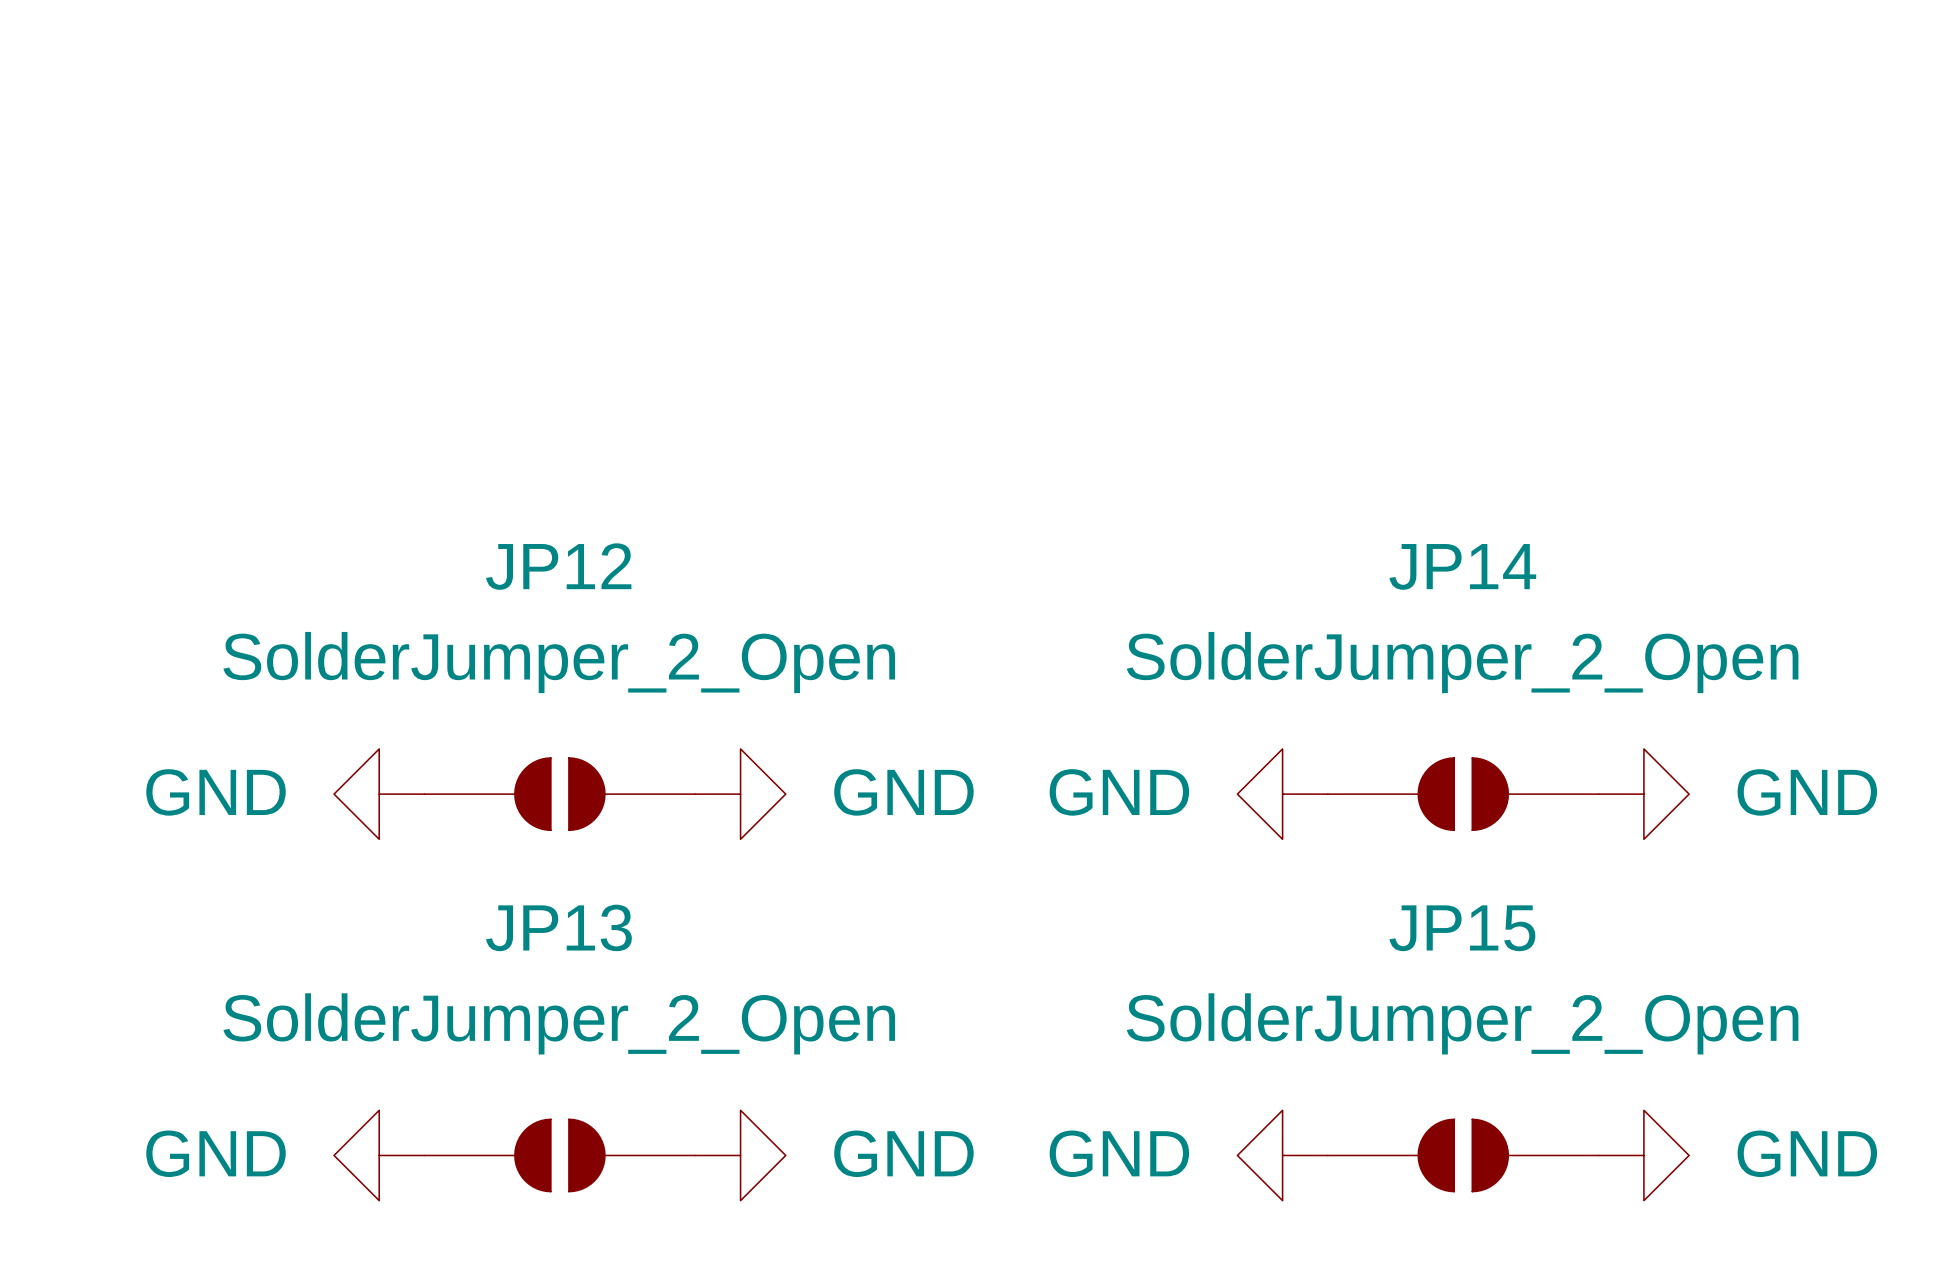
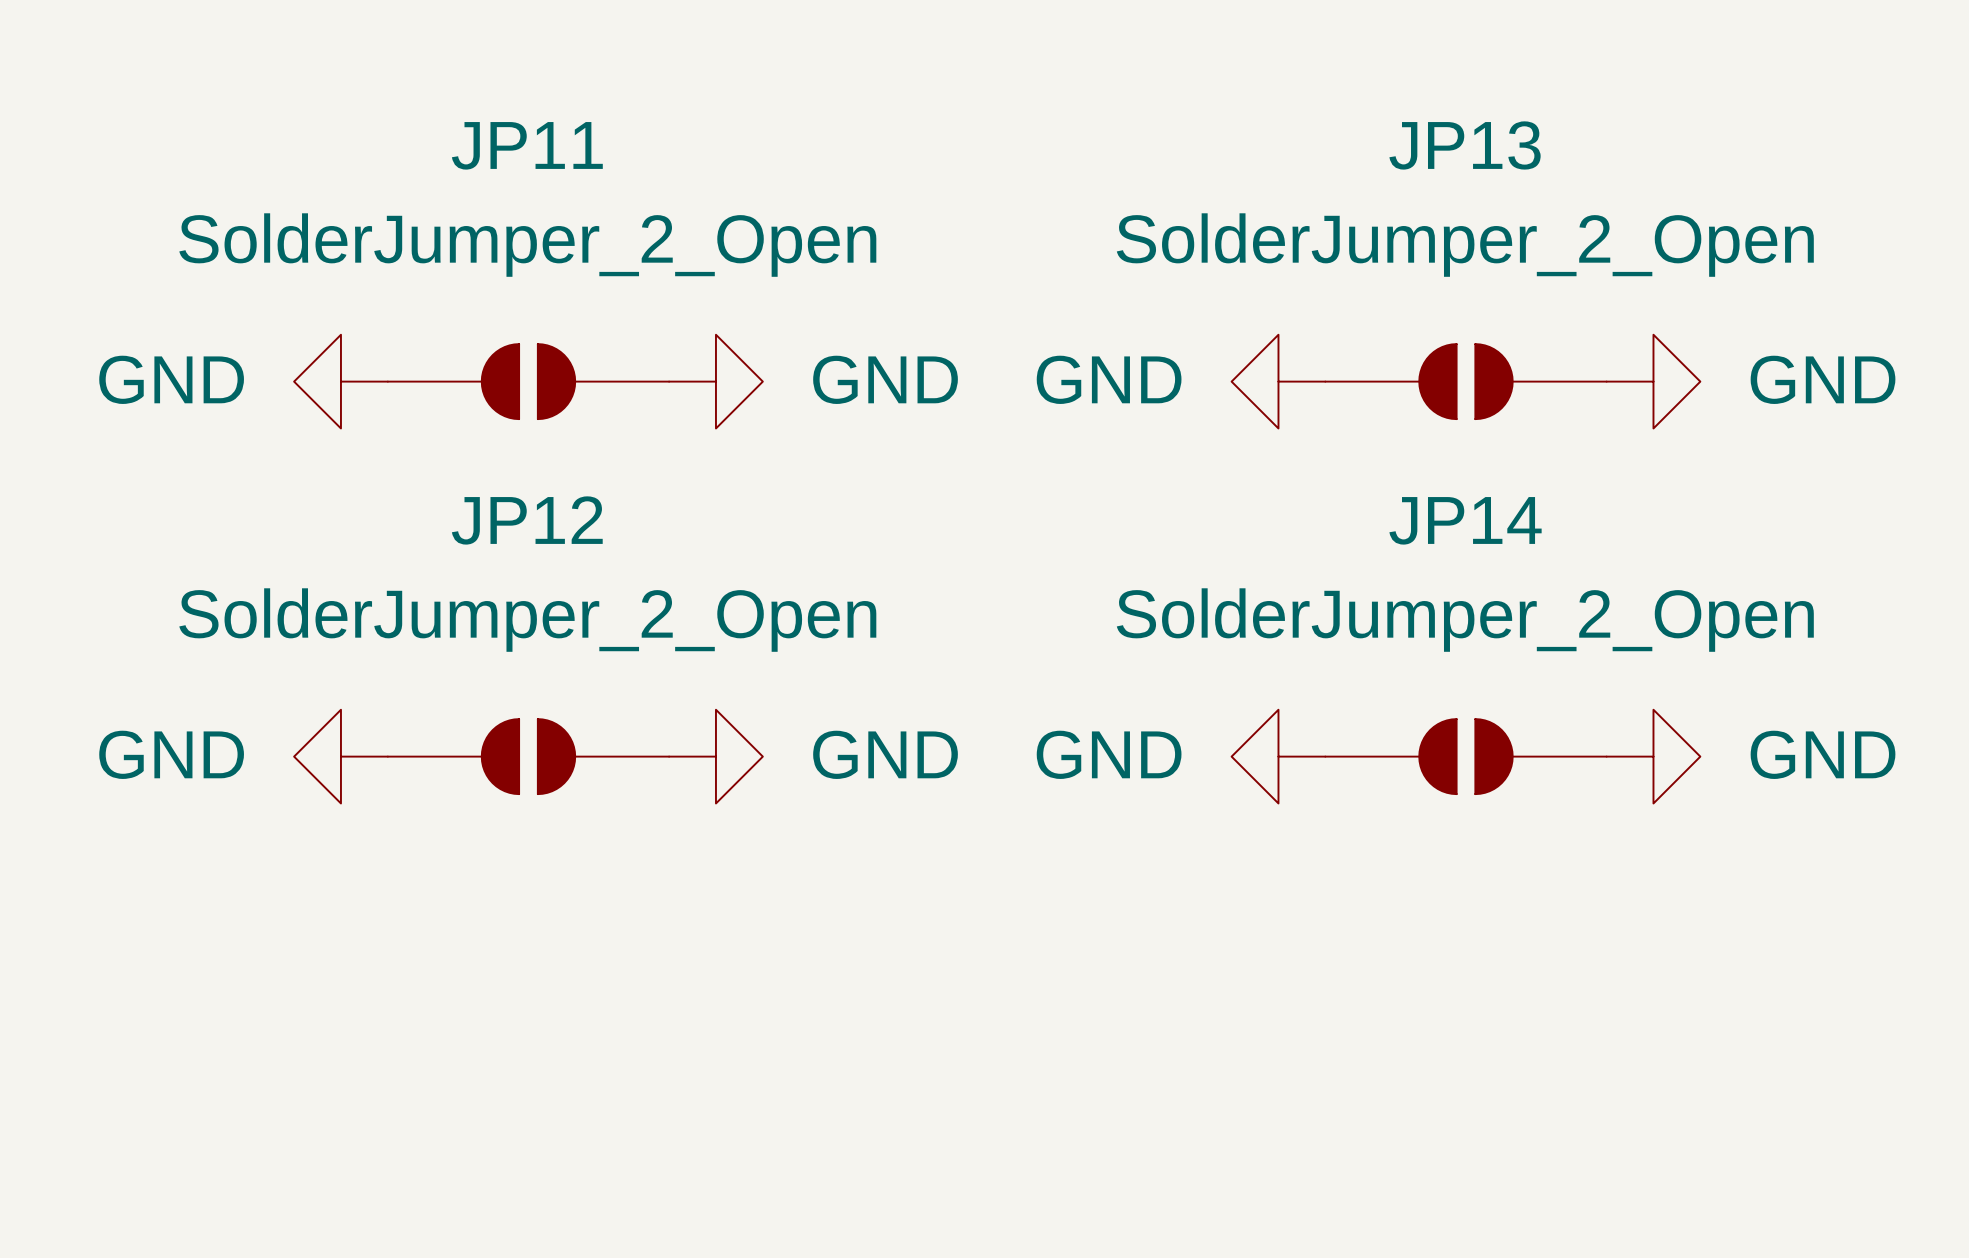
power symbol: none -> GND (340, 381)
JP11: none -> SolderJumper_2_Open (528, 381)
power symbol: none -> GND (715, 381)
power symbol: none -> GND (1278, 381)
power symbol: none -> GND (1653, 381)
power symbol: GND (379, 1155) -> none
JP13 position: (559, 1155) -> (1465, 381)
power symbol: GND (740, 1155) -> none
power symbol: GND (1282, 1155) -> none
JP15: SolderJumper_2_Open (1463, 1155) -> none
power symbol: GND (1643, 1155) -> none

